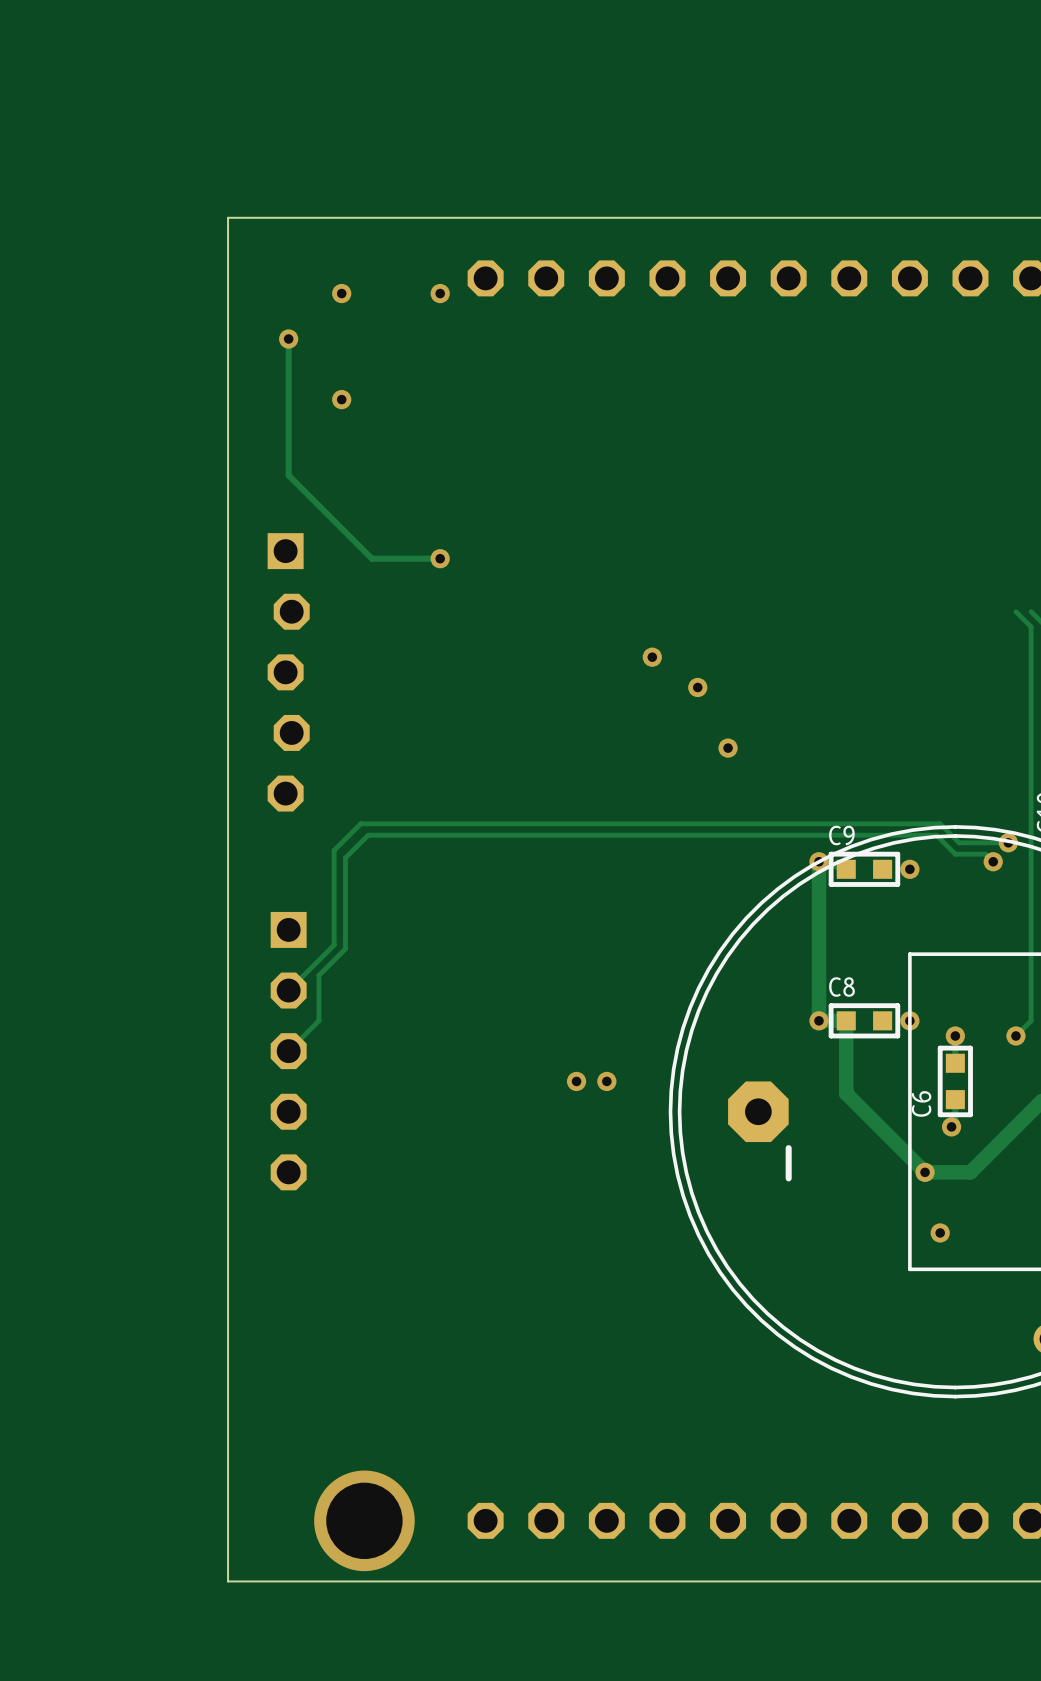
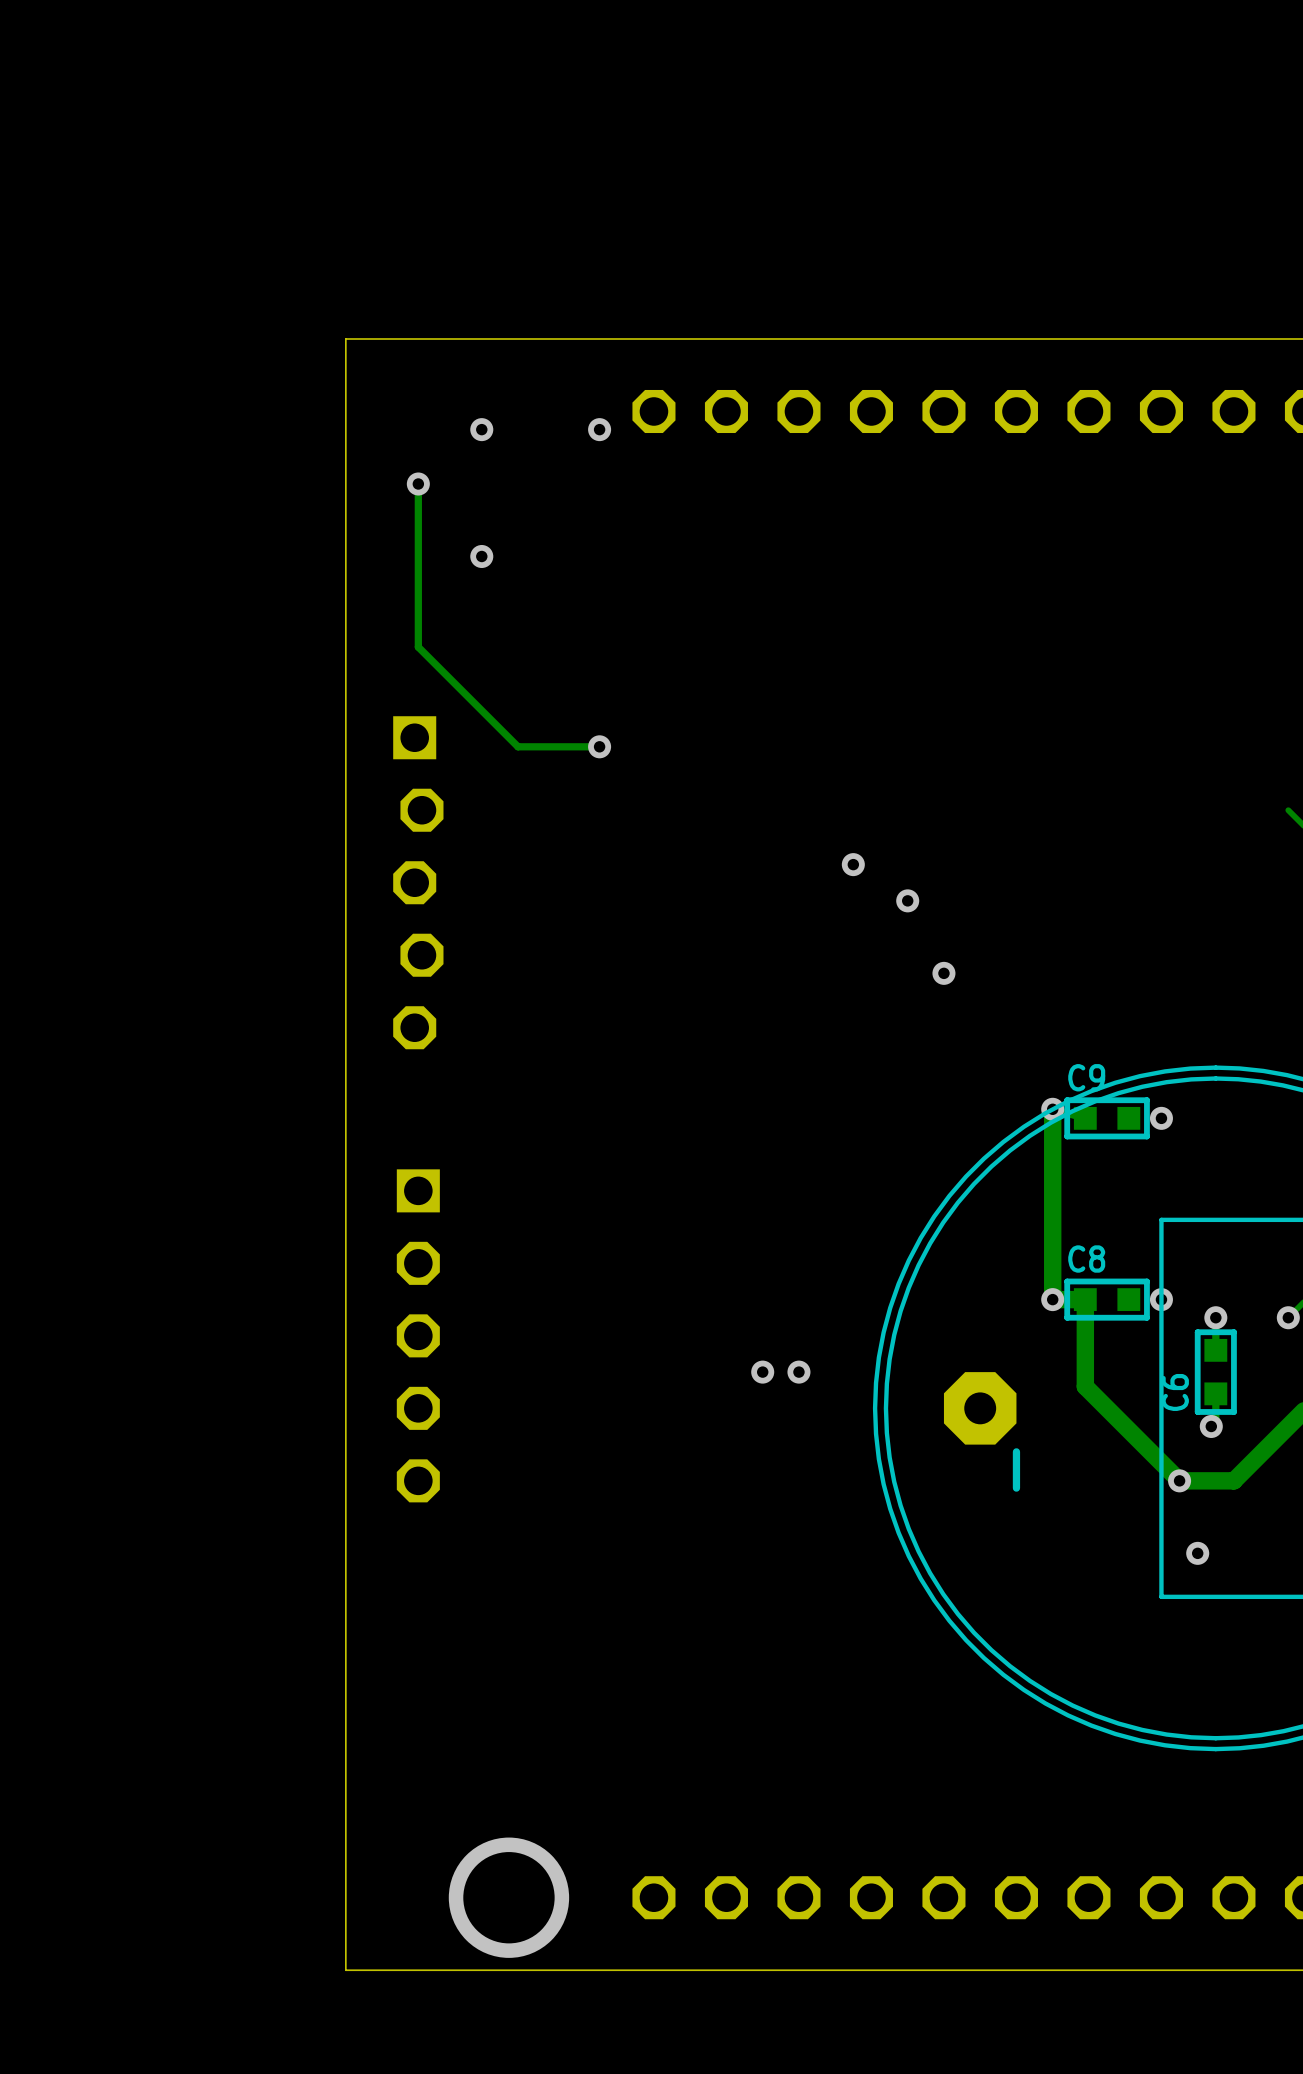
track: (1008, 842) (959, 842) (940, 823) (360, 823) (334, 850) (334, 945) (288, 990) -> none
via: (1008, 842) -> none
track: (993, 861) (985, 854) (955, 854) (936, 835) (368, 835) (345, 857) (345, 948) (318, 975) (318, 1020) (288, 1051) -> none
via: (993, 861) -> none

